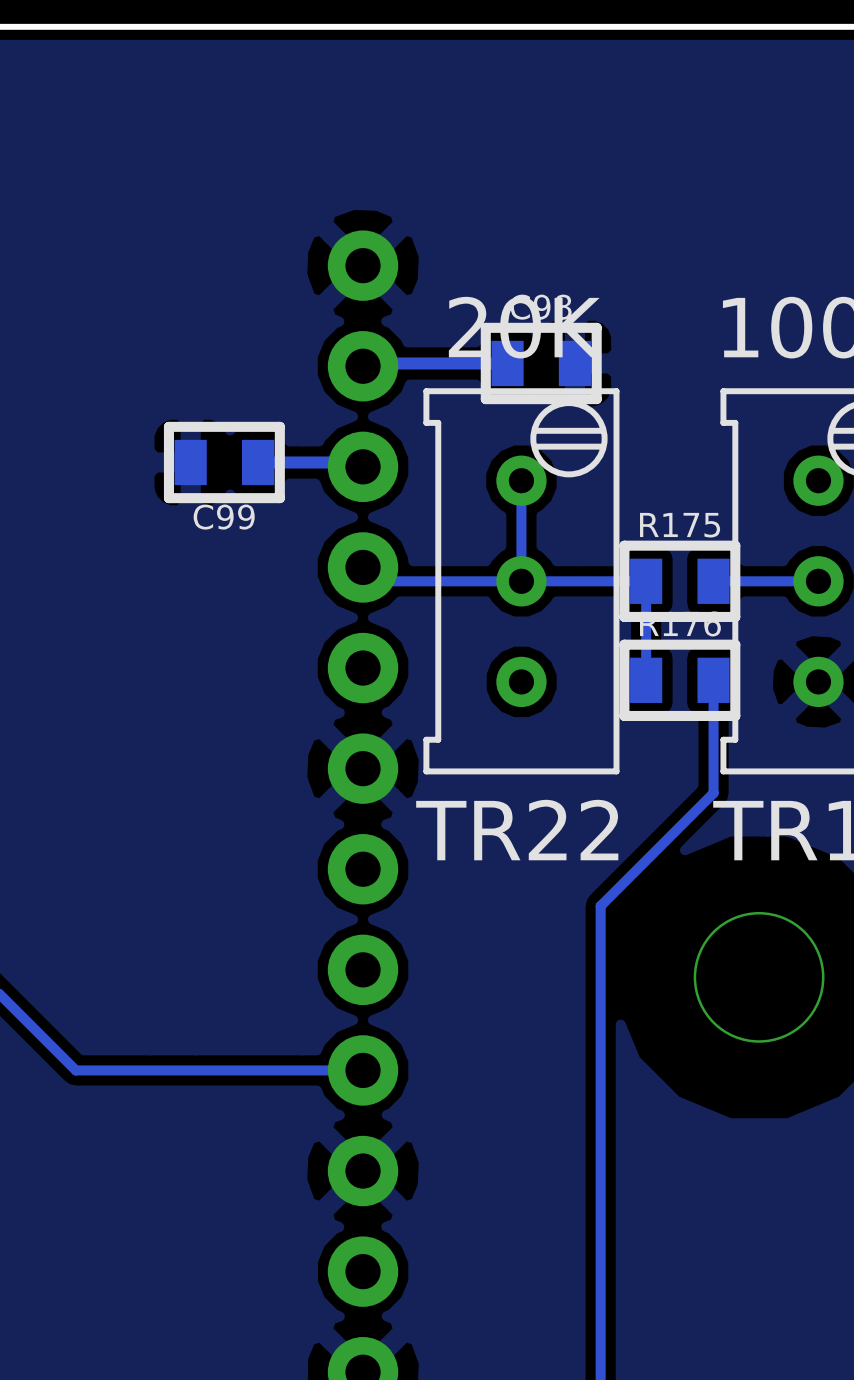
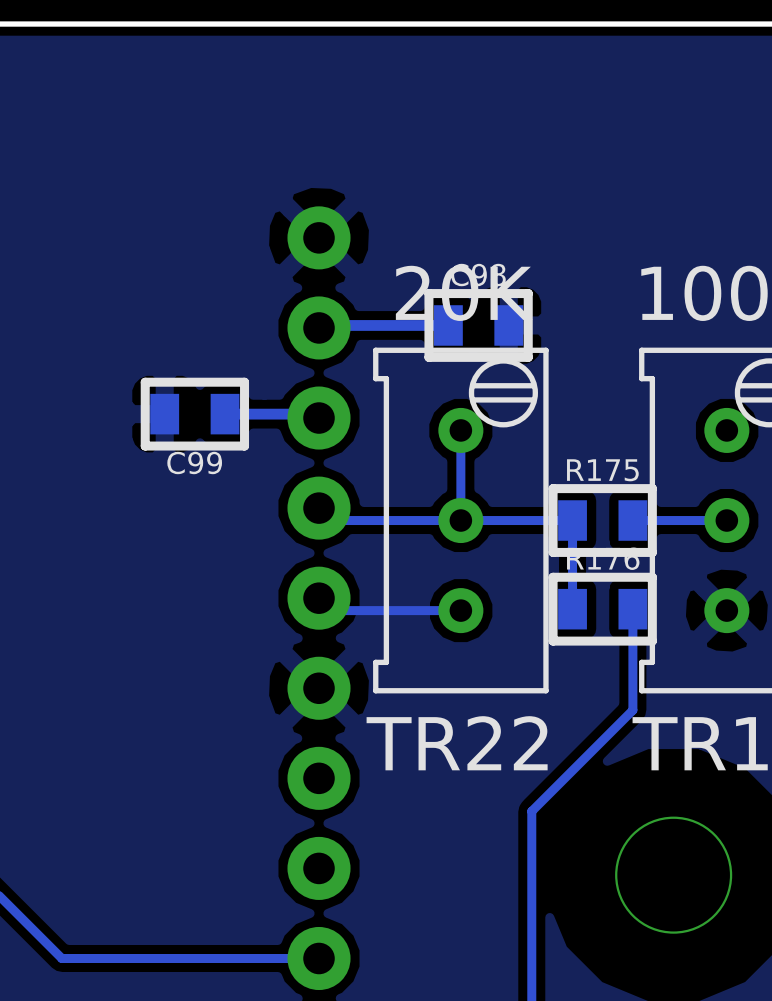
track: none -> (319, 598) (331, 610) (460, 610)

